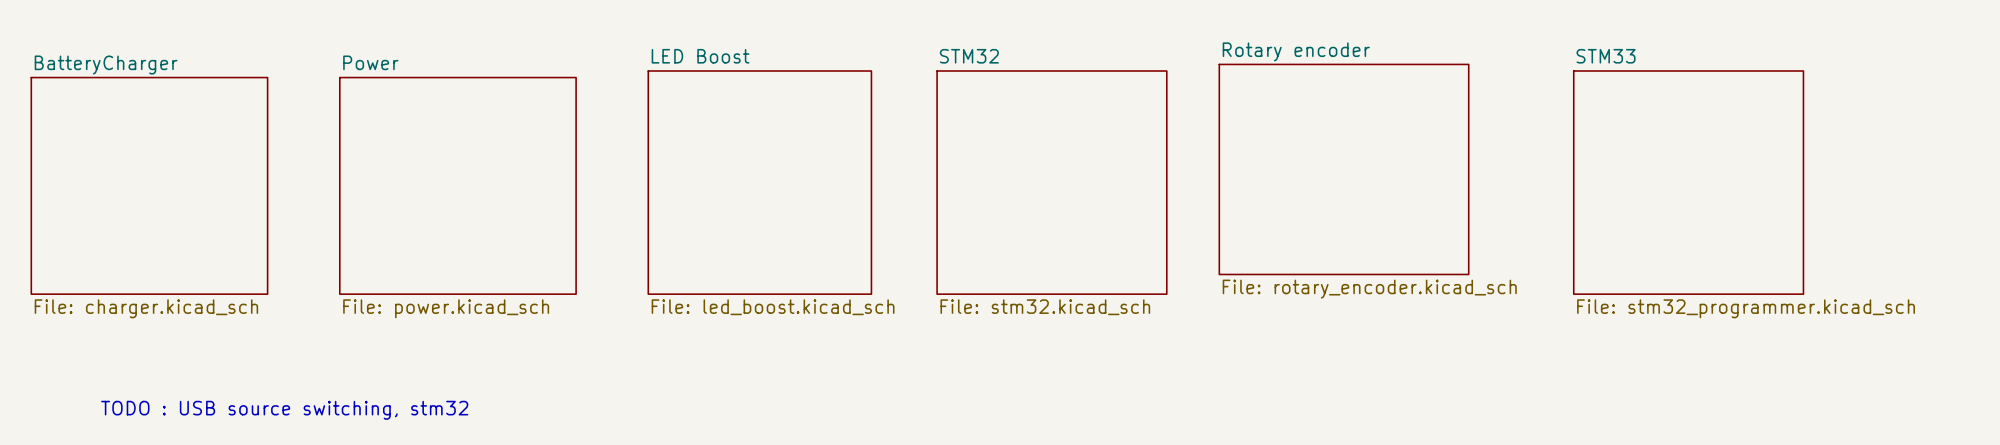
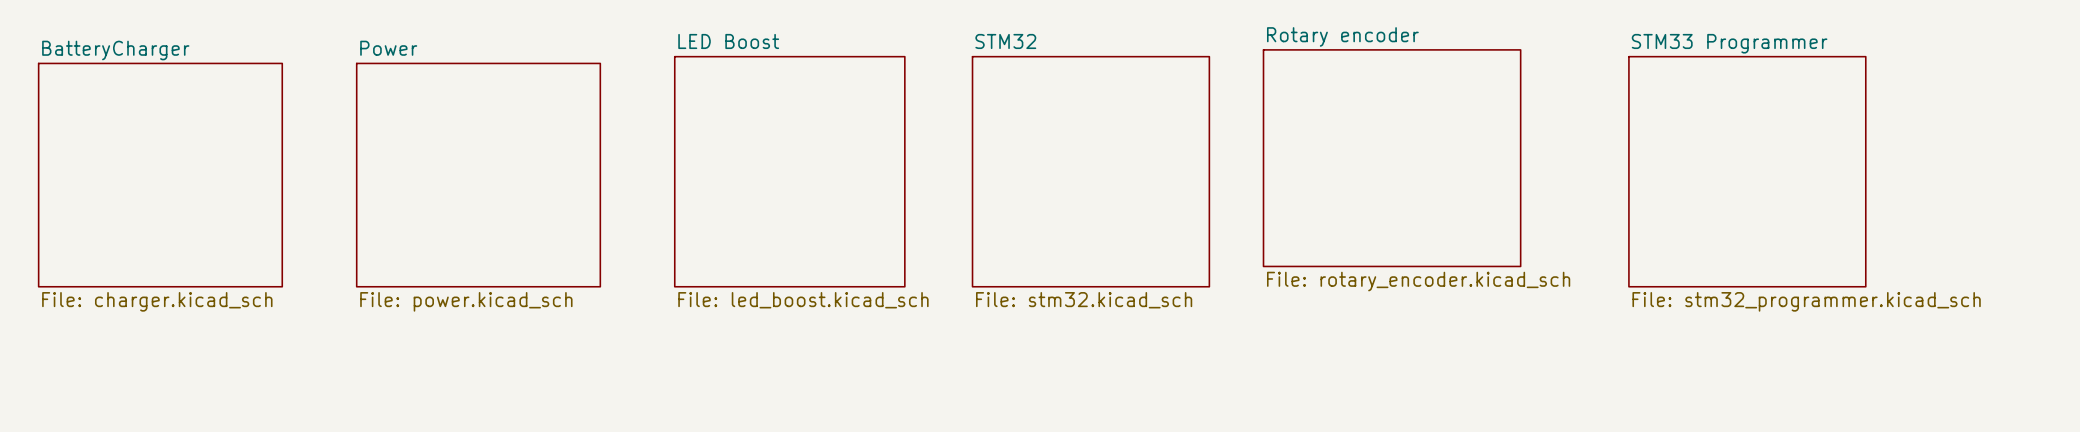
sheet STM33 name: STM33 (1606, 56) -> STM33 Programmer (1729, 43)
text: TODO : USB source switching, stm32 (284, 410) -> none

